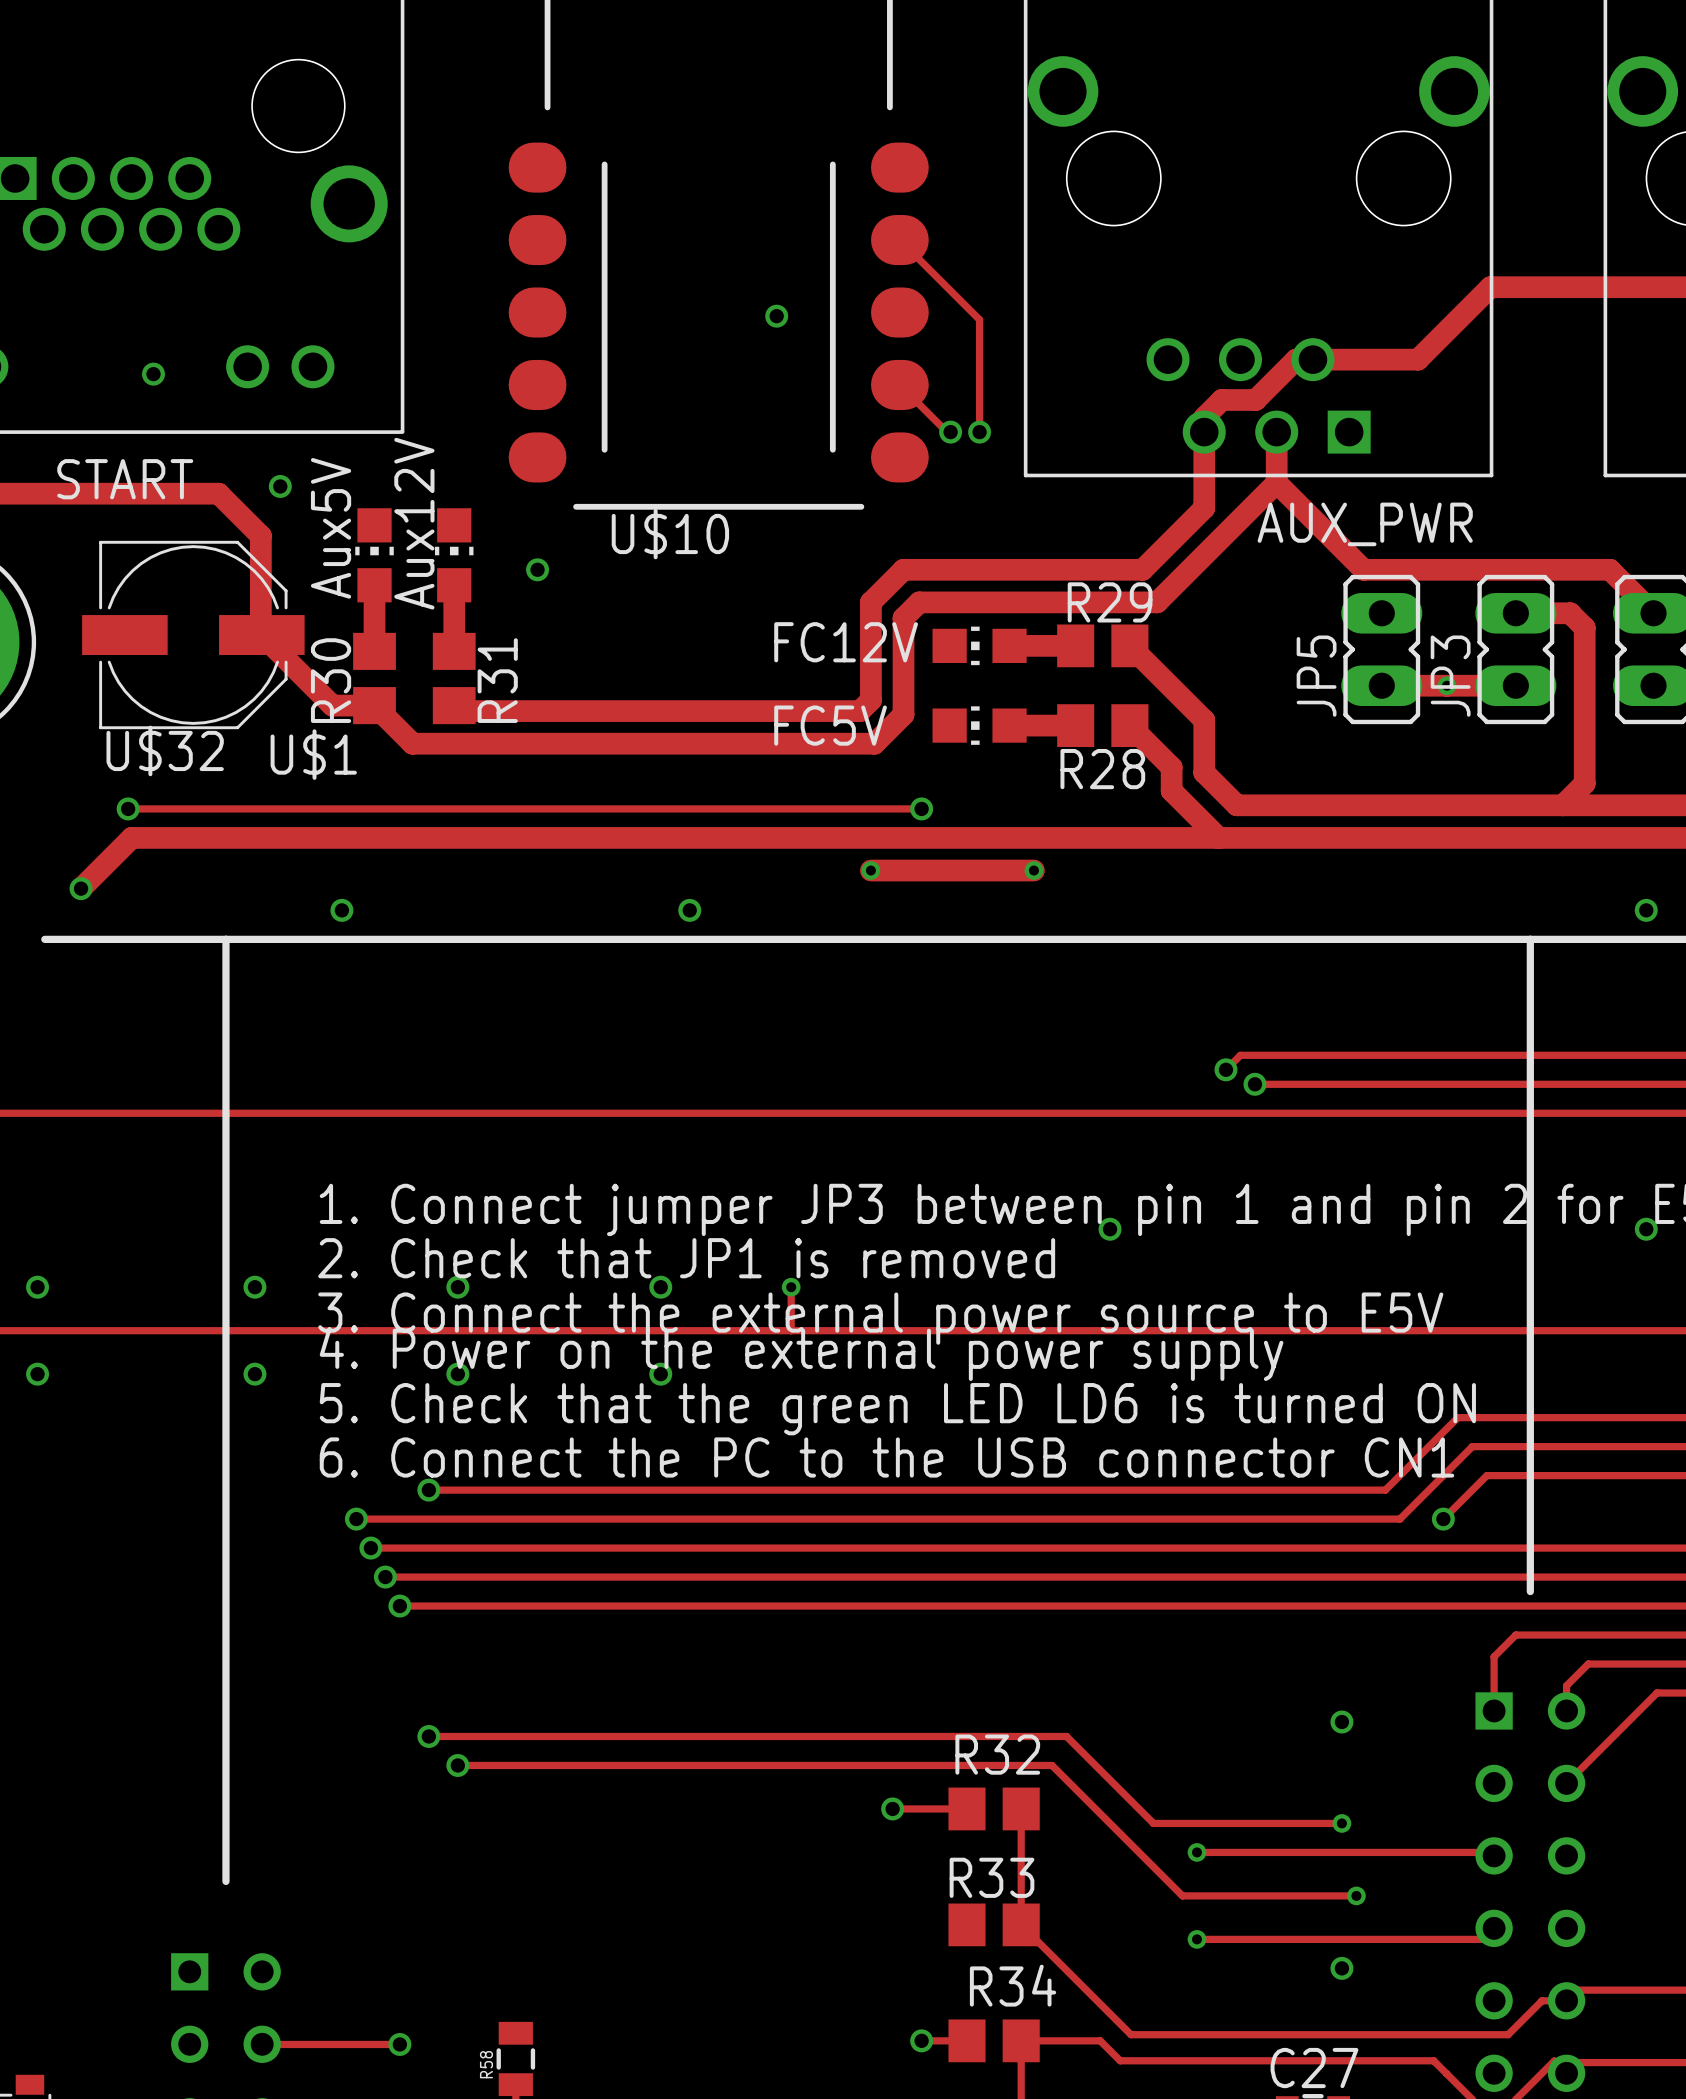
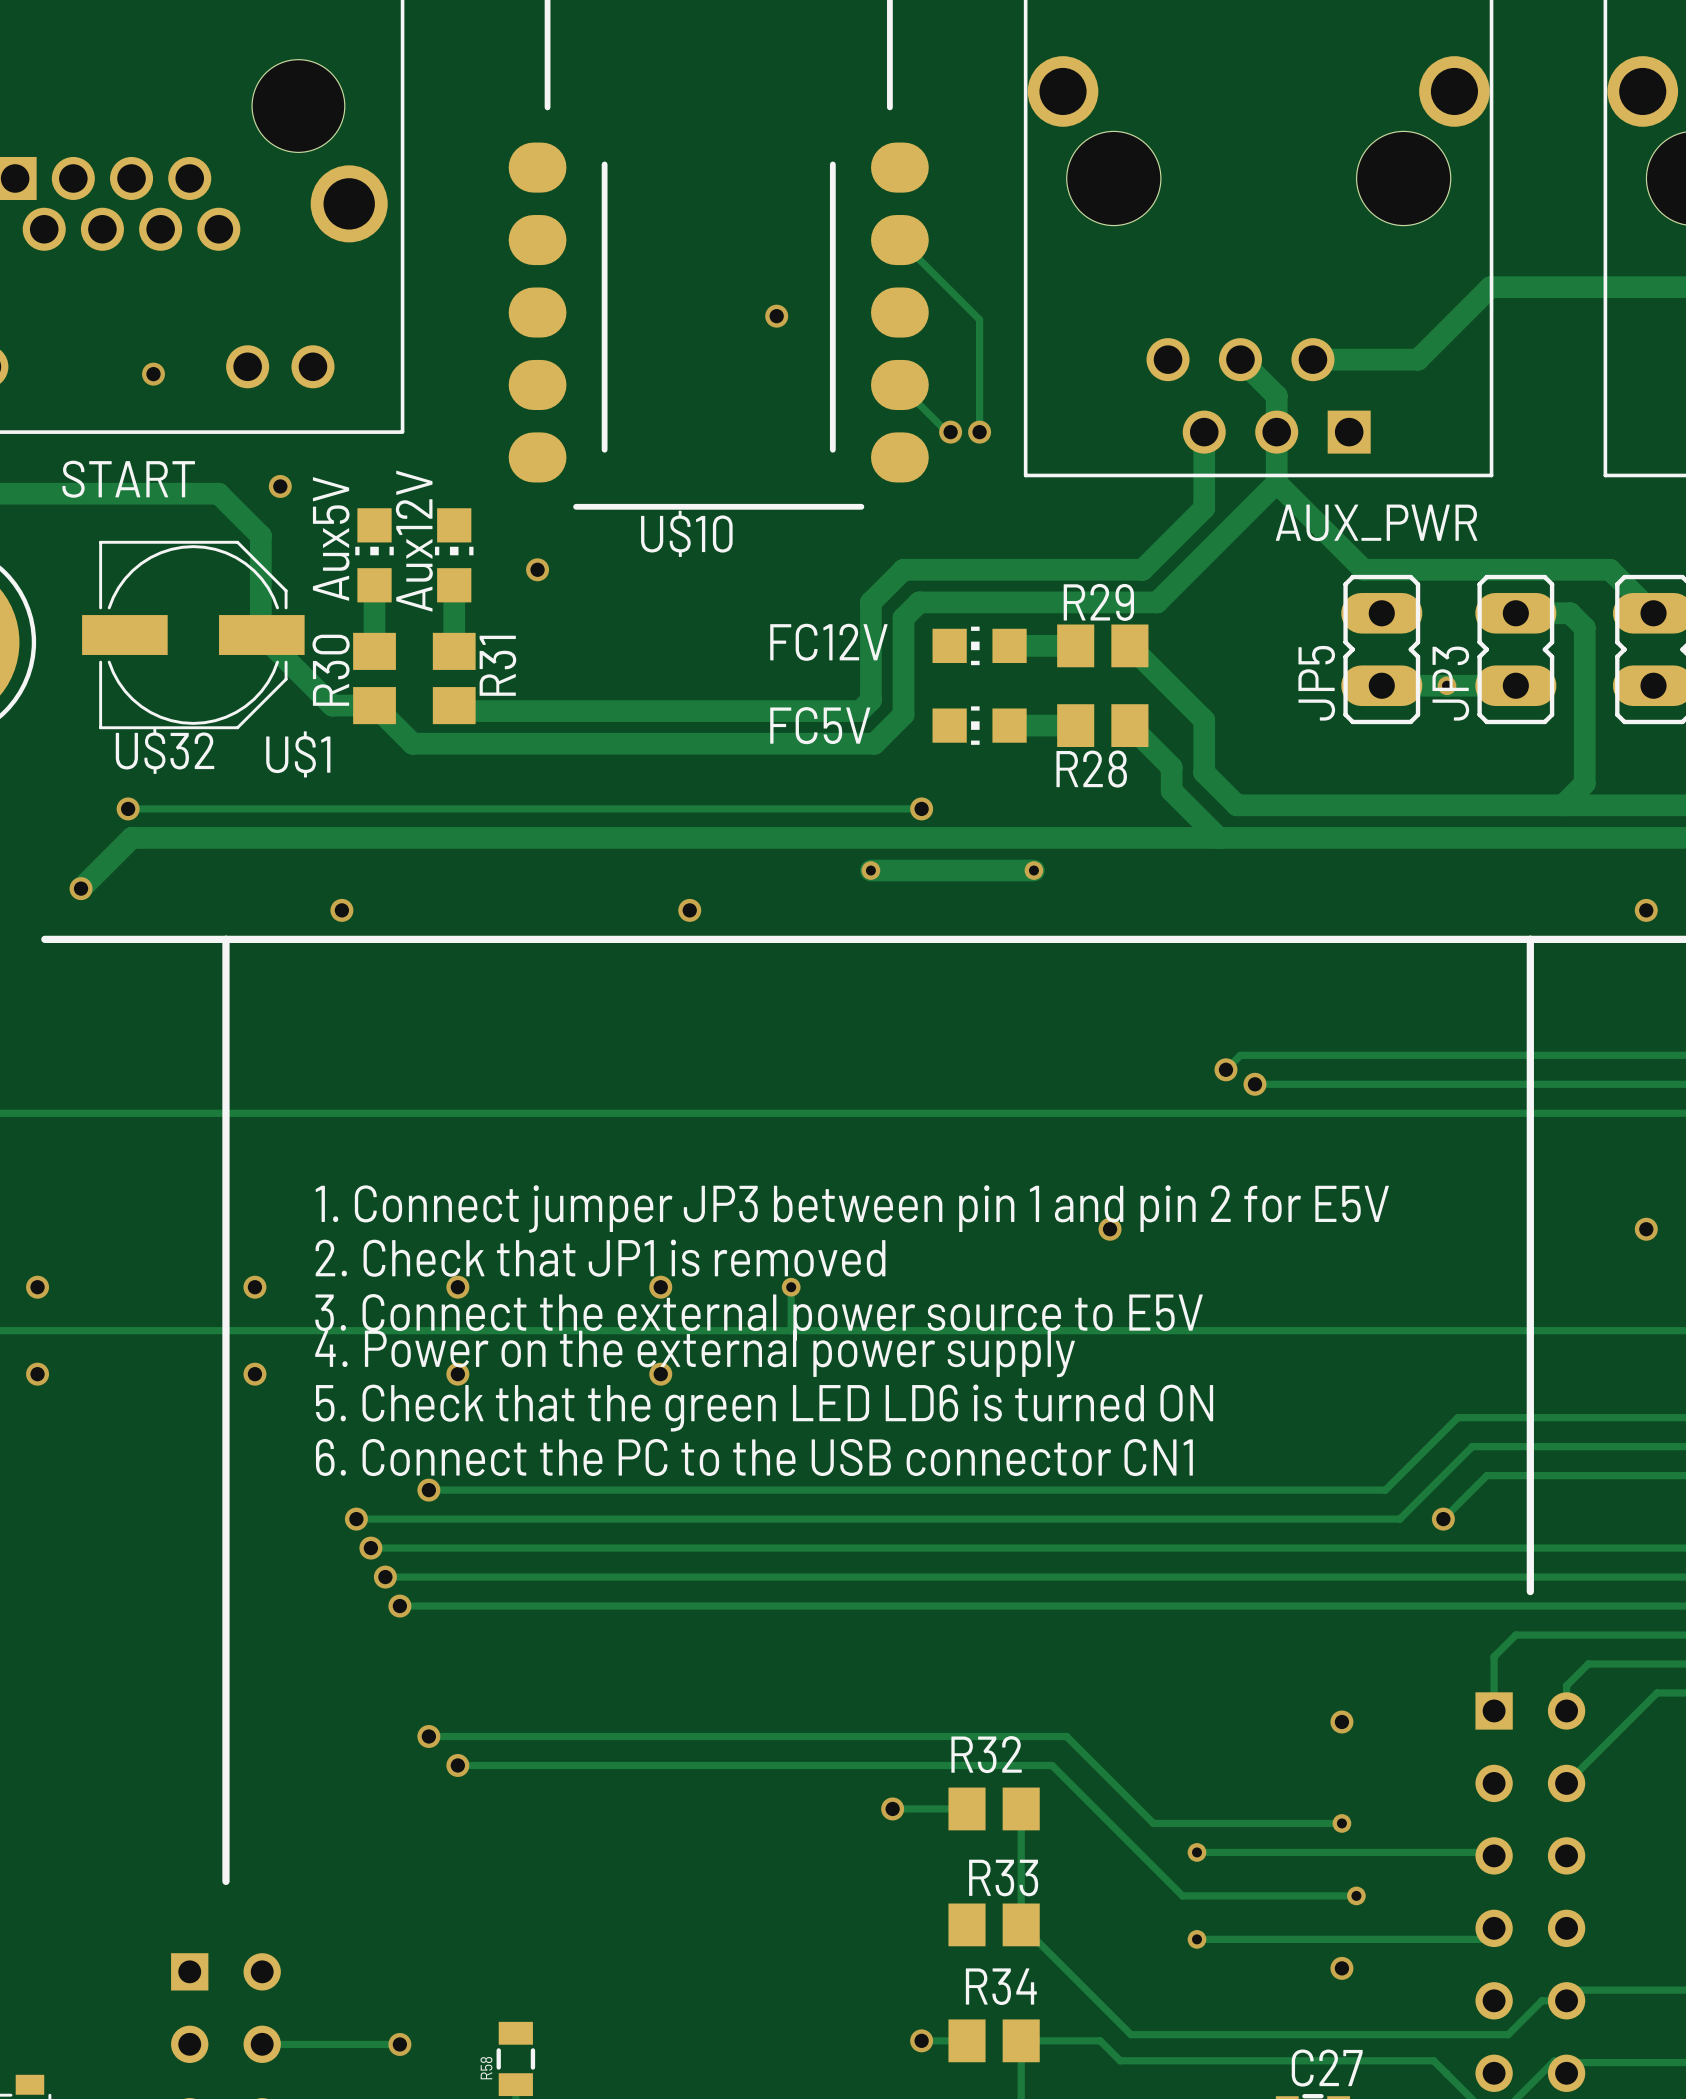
track: none -> (1240, 359) (1276, 395) (1276, 432)
track: (1312, 359) (1296, 359) (1255, 400) (1221, 400) (1204, 417) (1204, 432) -> none

